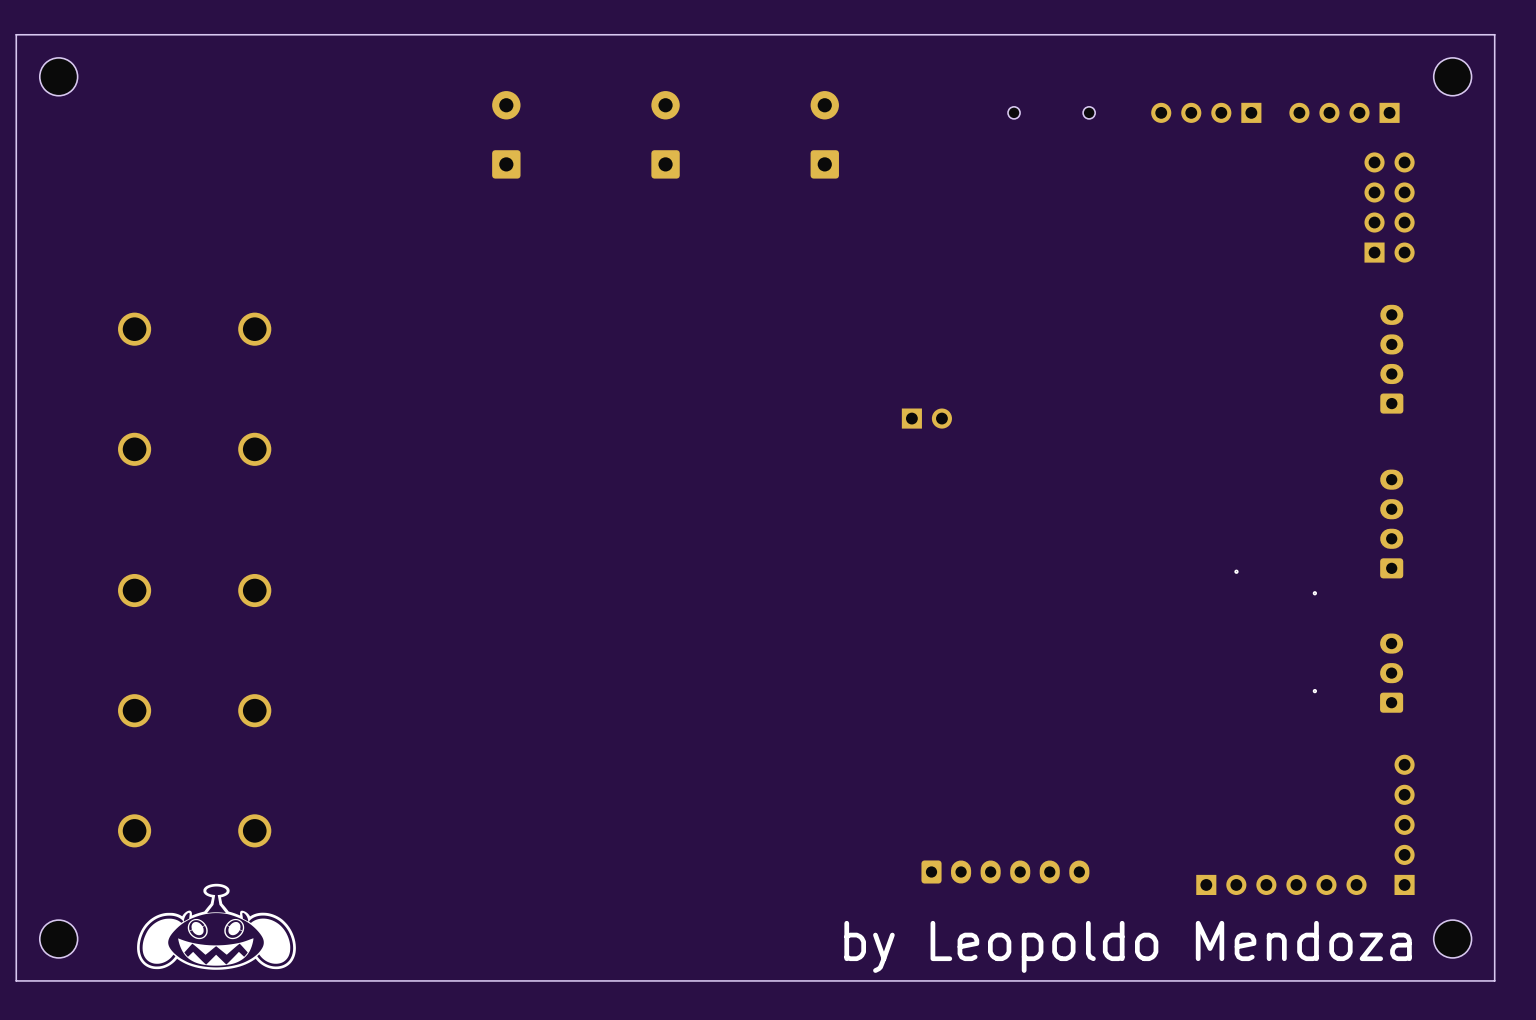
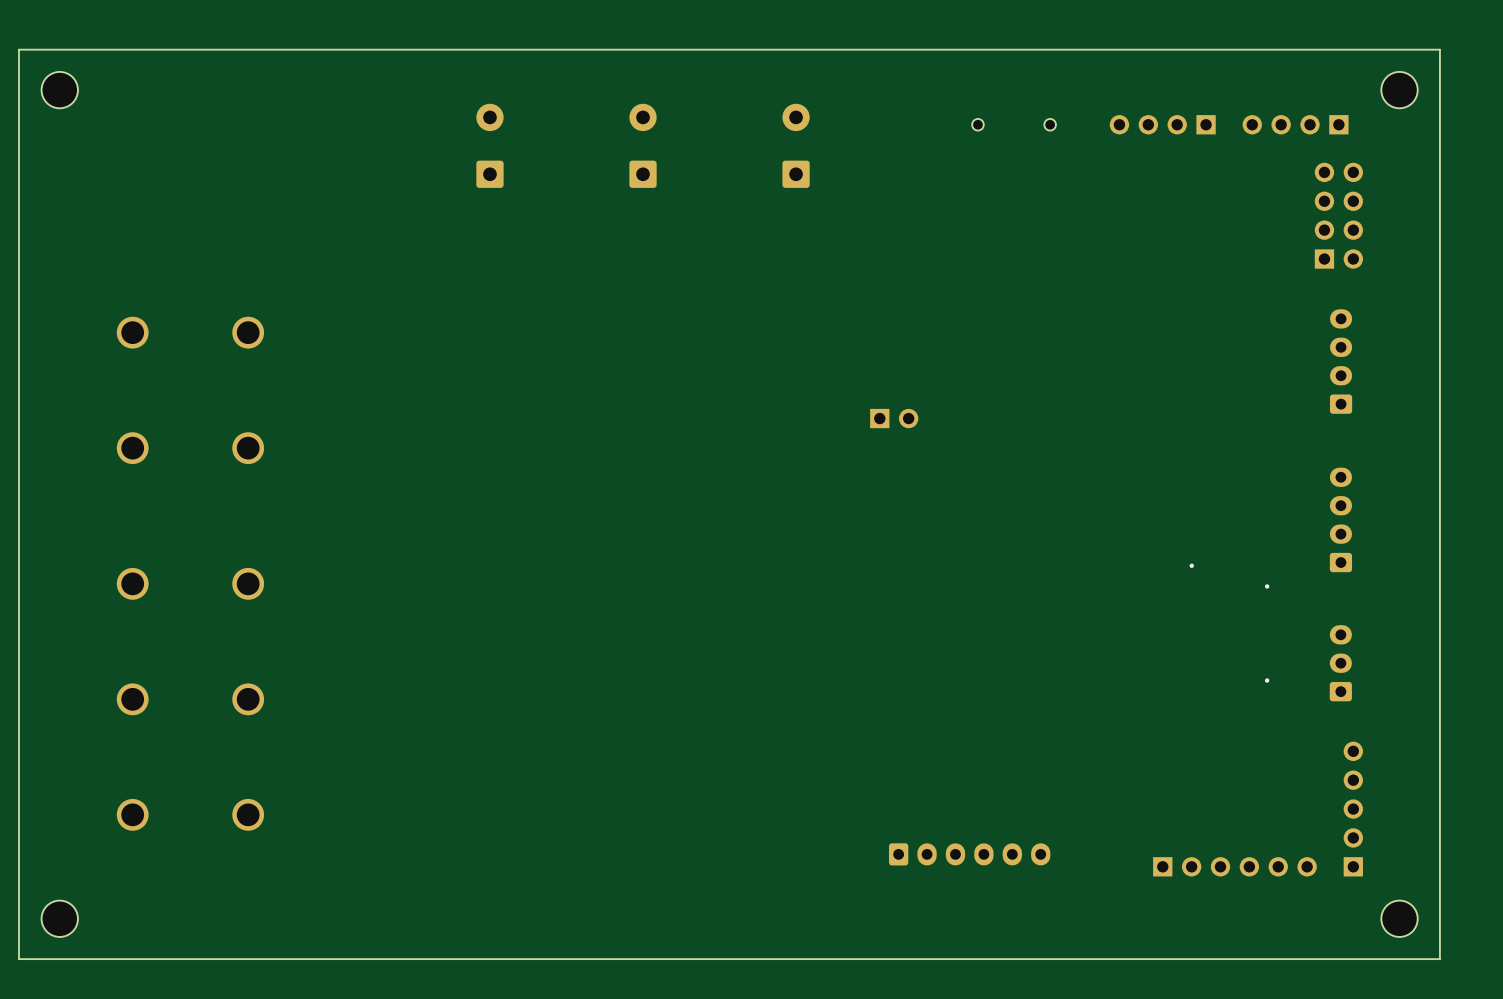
drawing: [137, 883, 296, 970] -> none
text: by Leopoldo Mendoza (1128, 946) -> none

